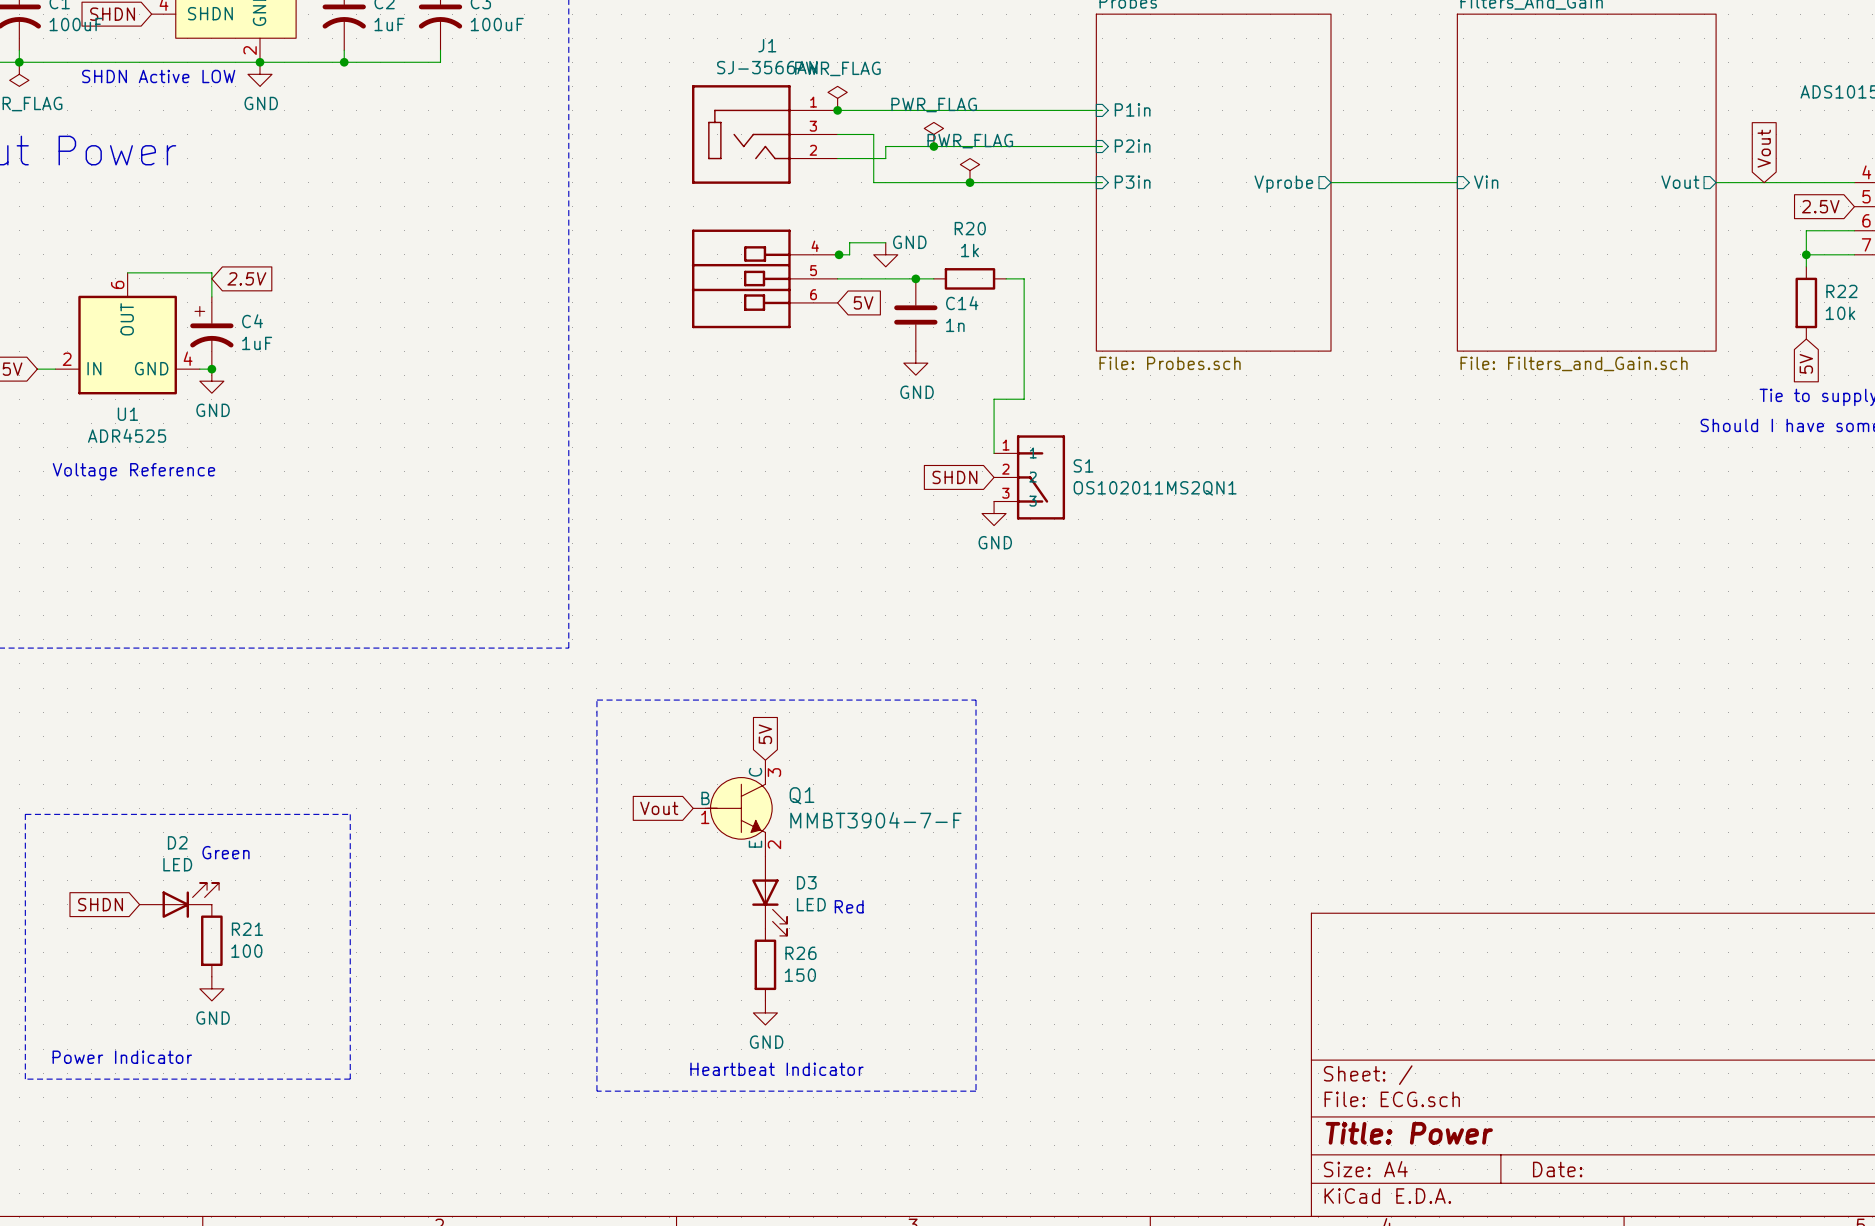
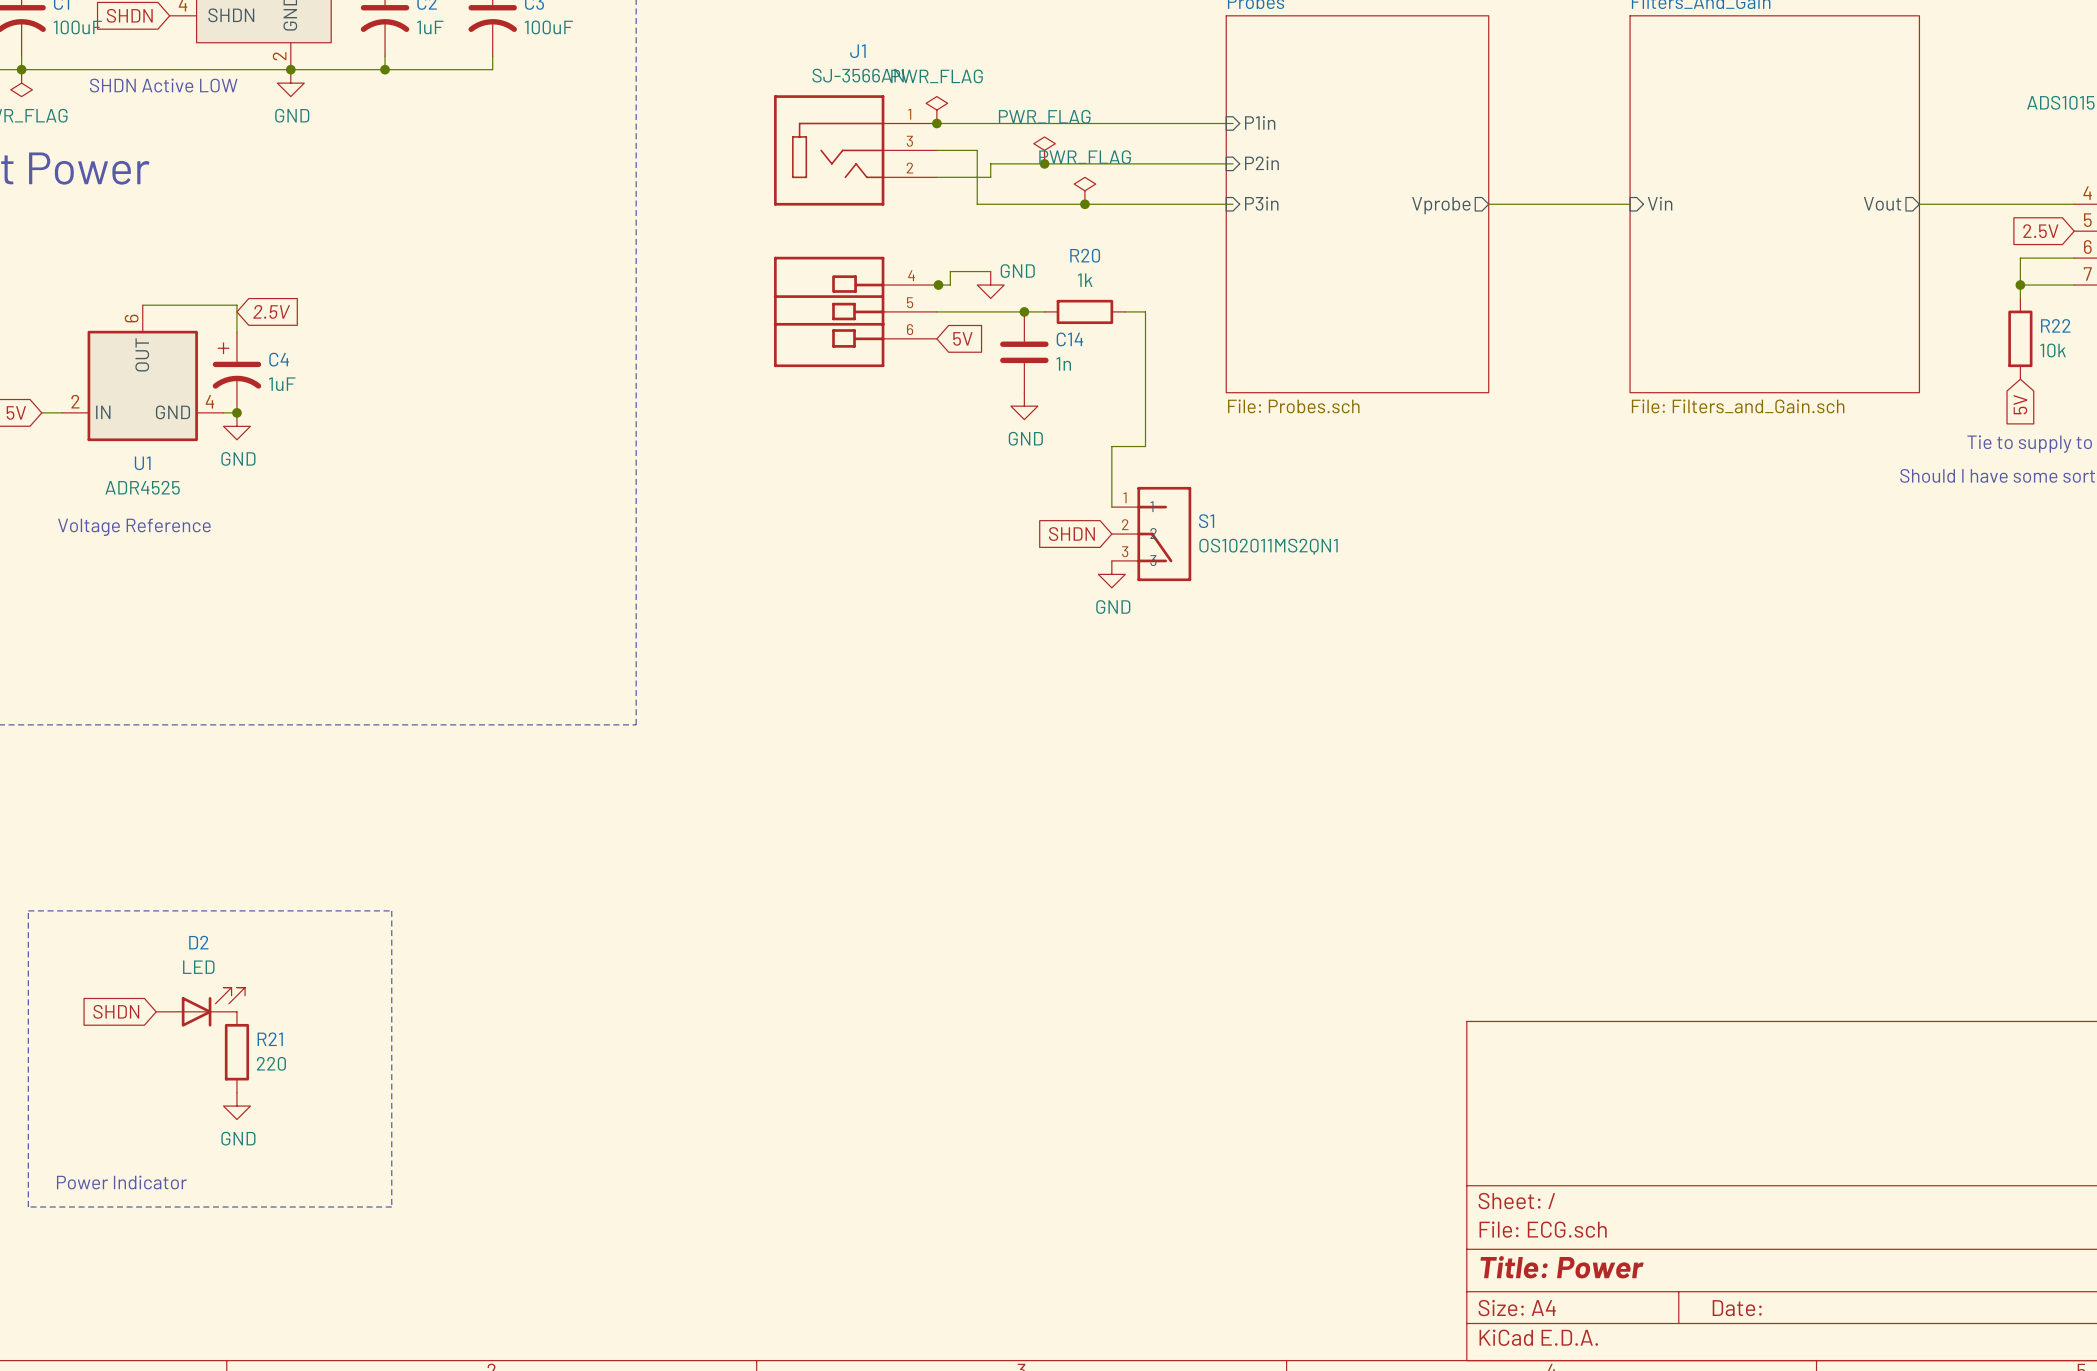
global label: Vout (1764, 148) -> none
line: (596, 700) (976, 700) (976, 1091) (596, 1091) (596, 700) -> none
global label: 5V (765, 734) -> none
global label: Vout (659, 808) -> none
Q1: MMBT3904-7-F (732, 808) -> none
text: Green (225, 852) -> none
D3: LED (769, 896) -> none
text: Red (849, 906) -> none
R21 value: 100 (246, 951) -> 220 (271, 1063)
R26: 150 (765, 964) -> none
power symbol: GND (765, 1012) -> none
text: Heartbeat Indicator (776, 1069) -> none

